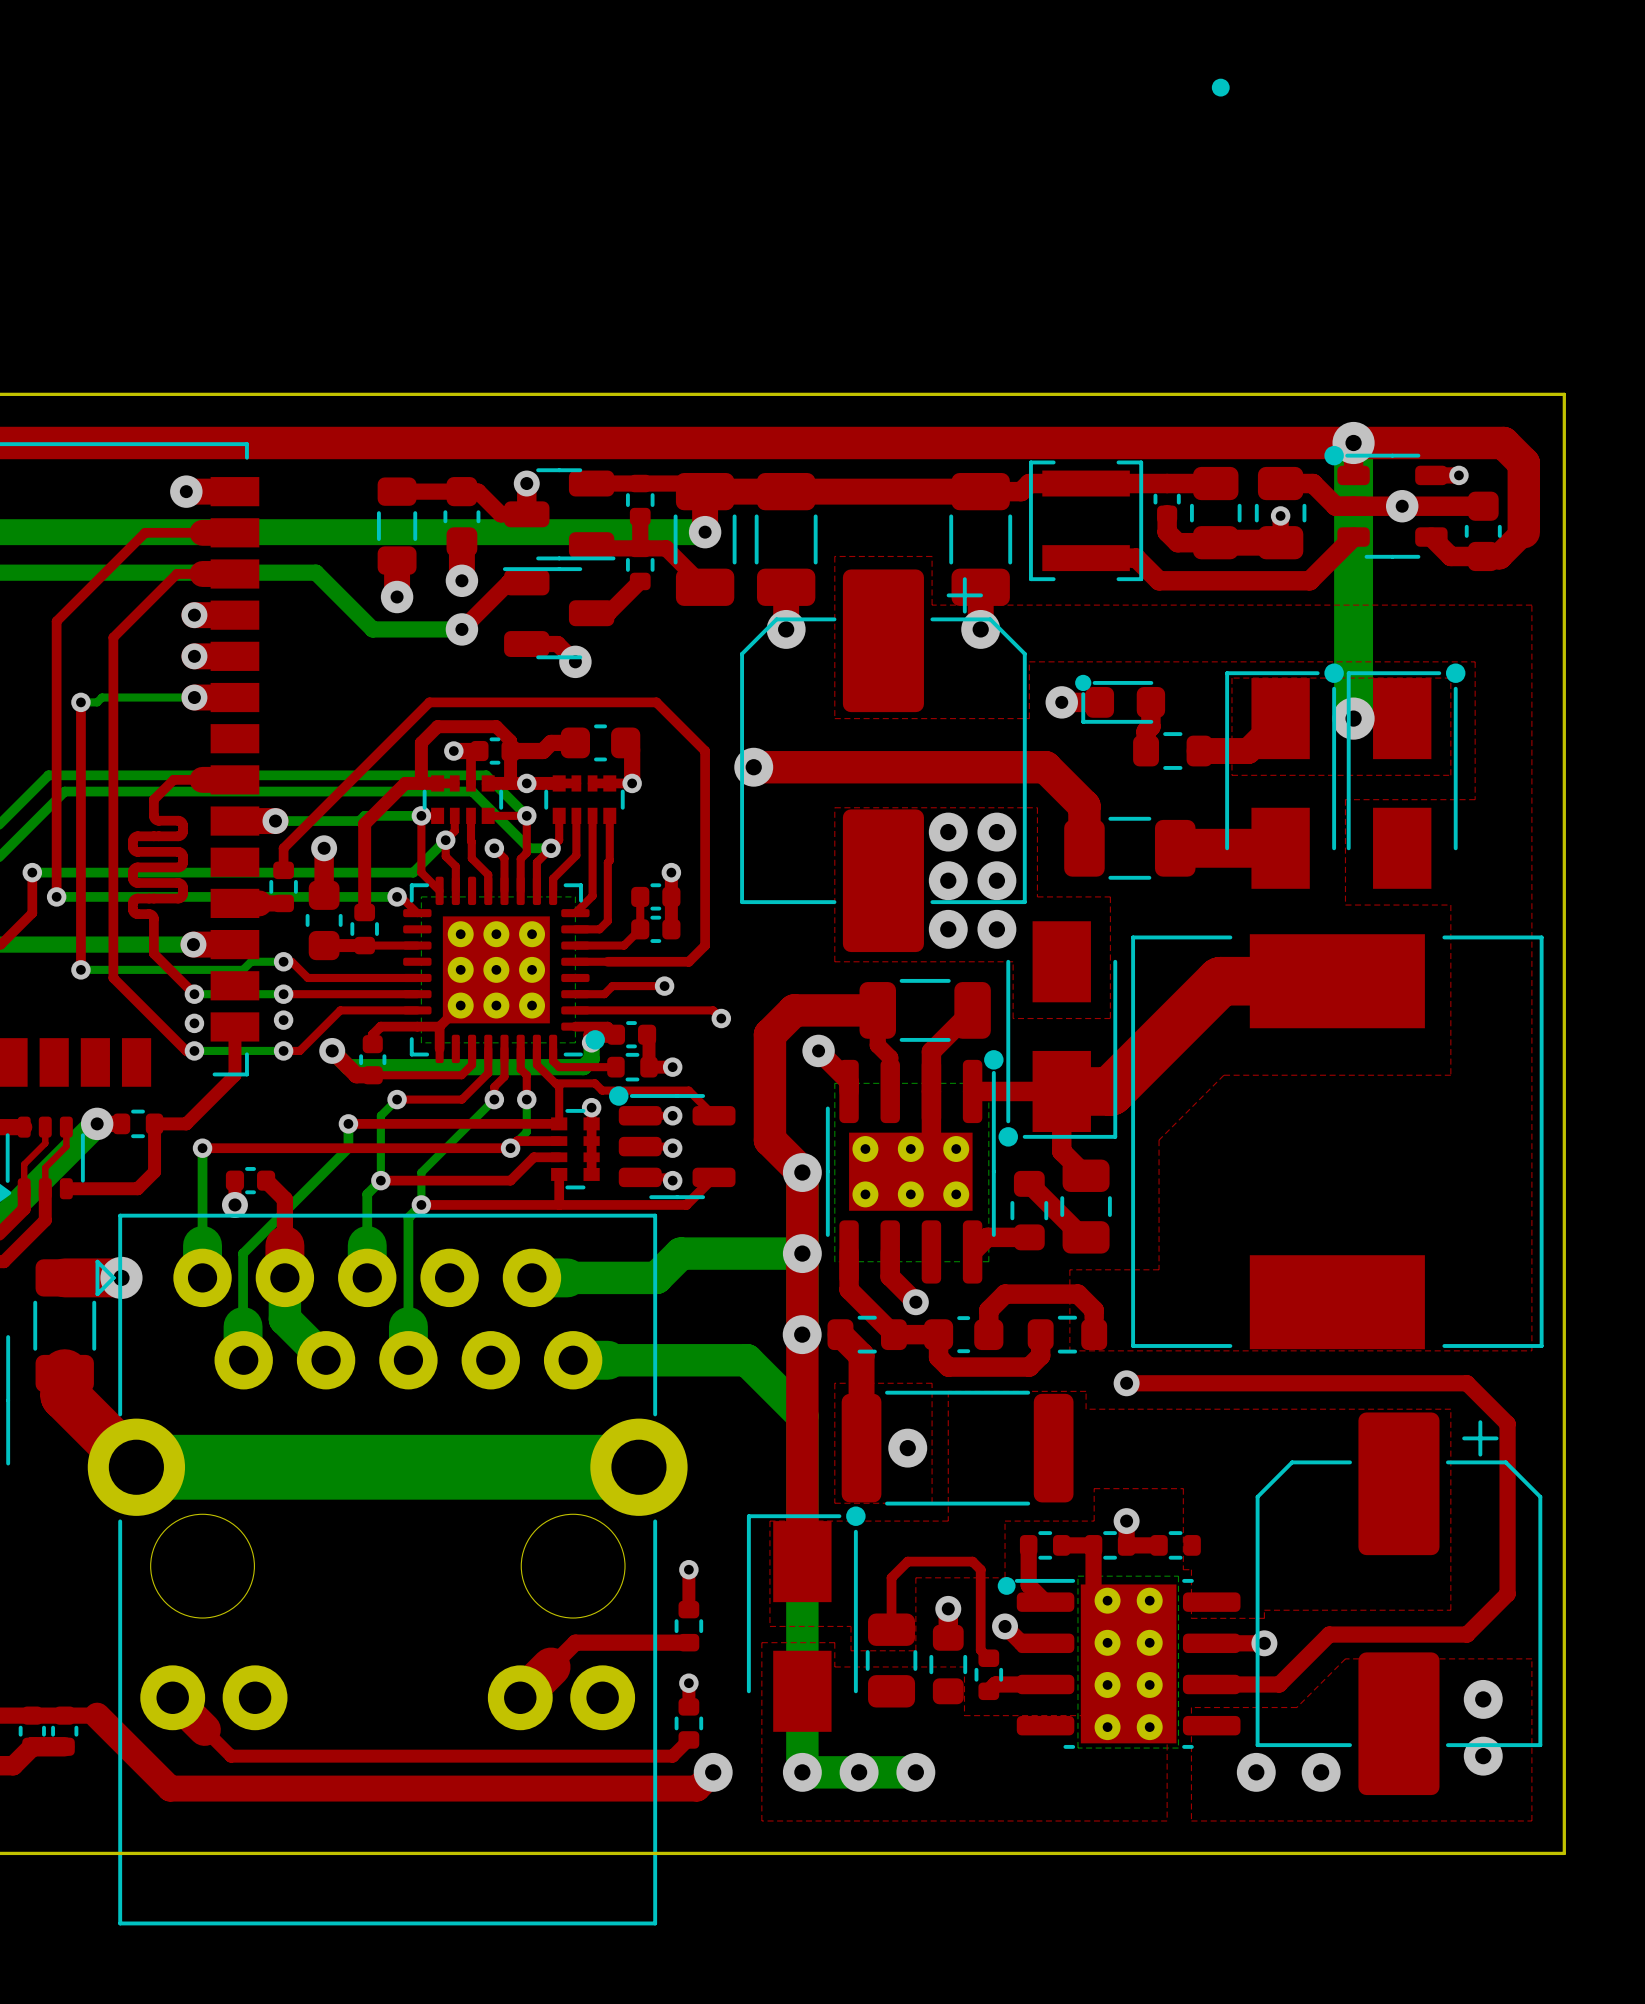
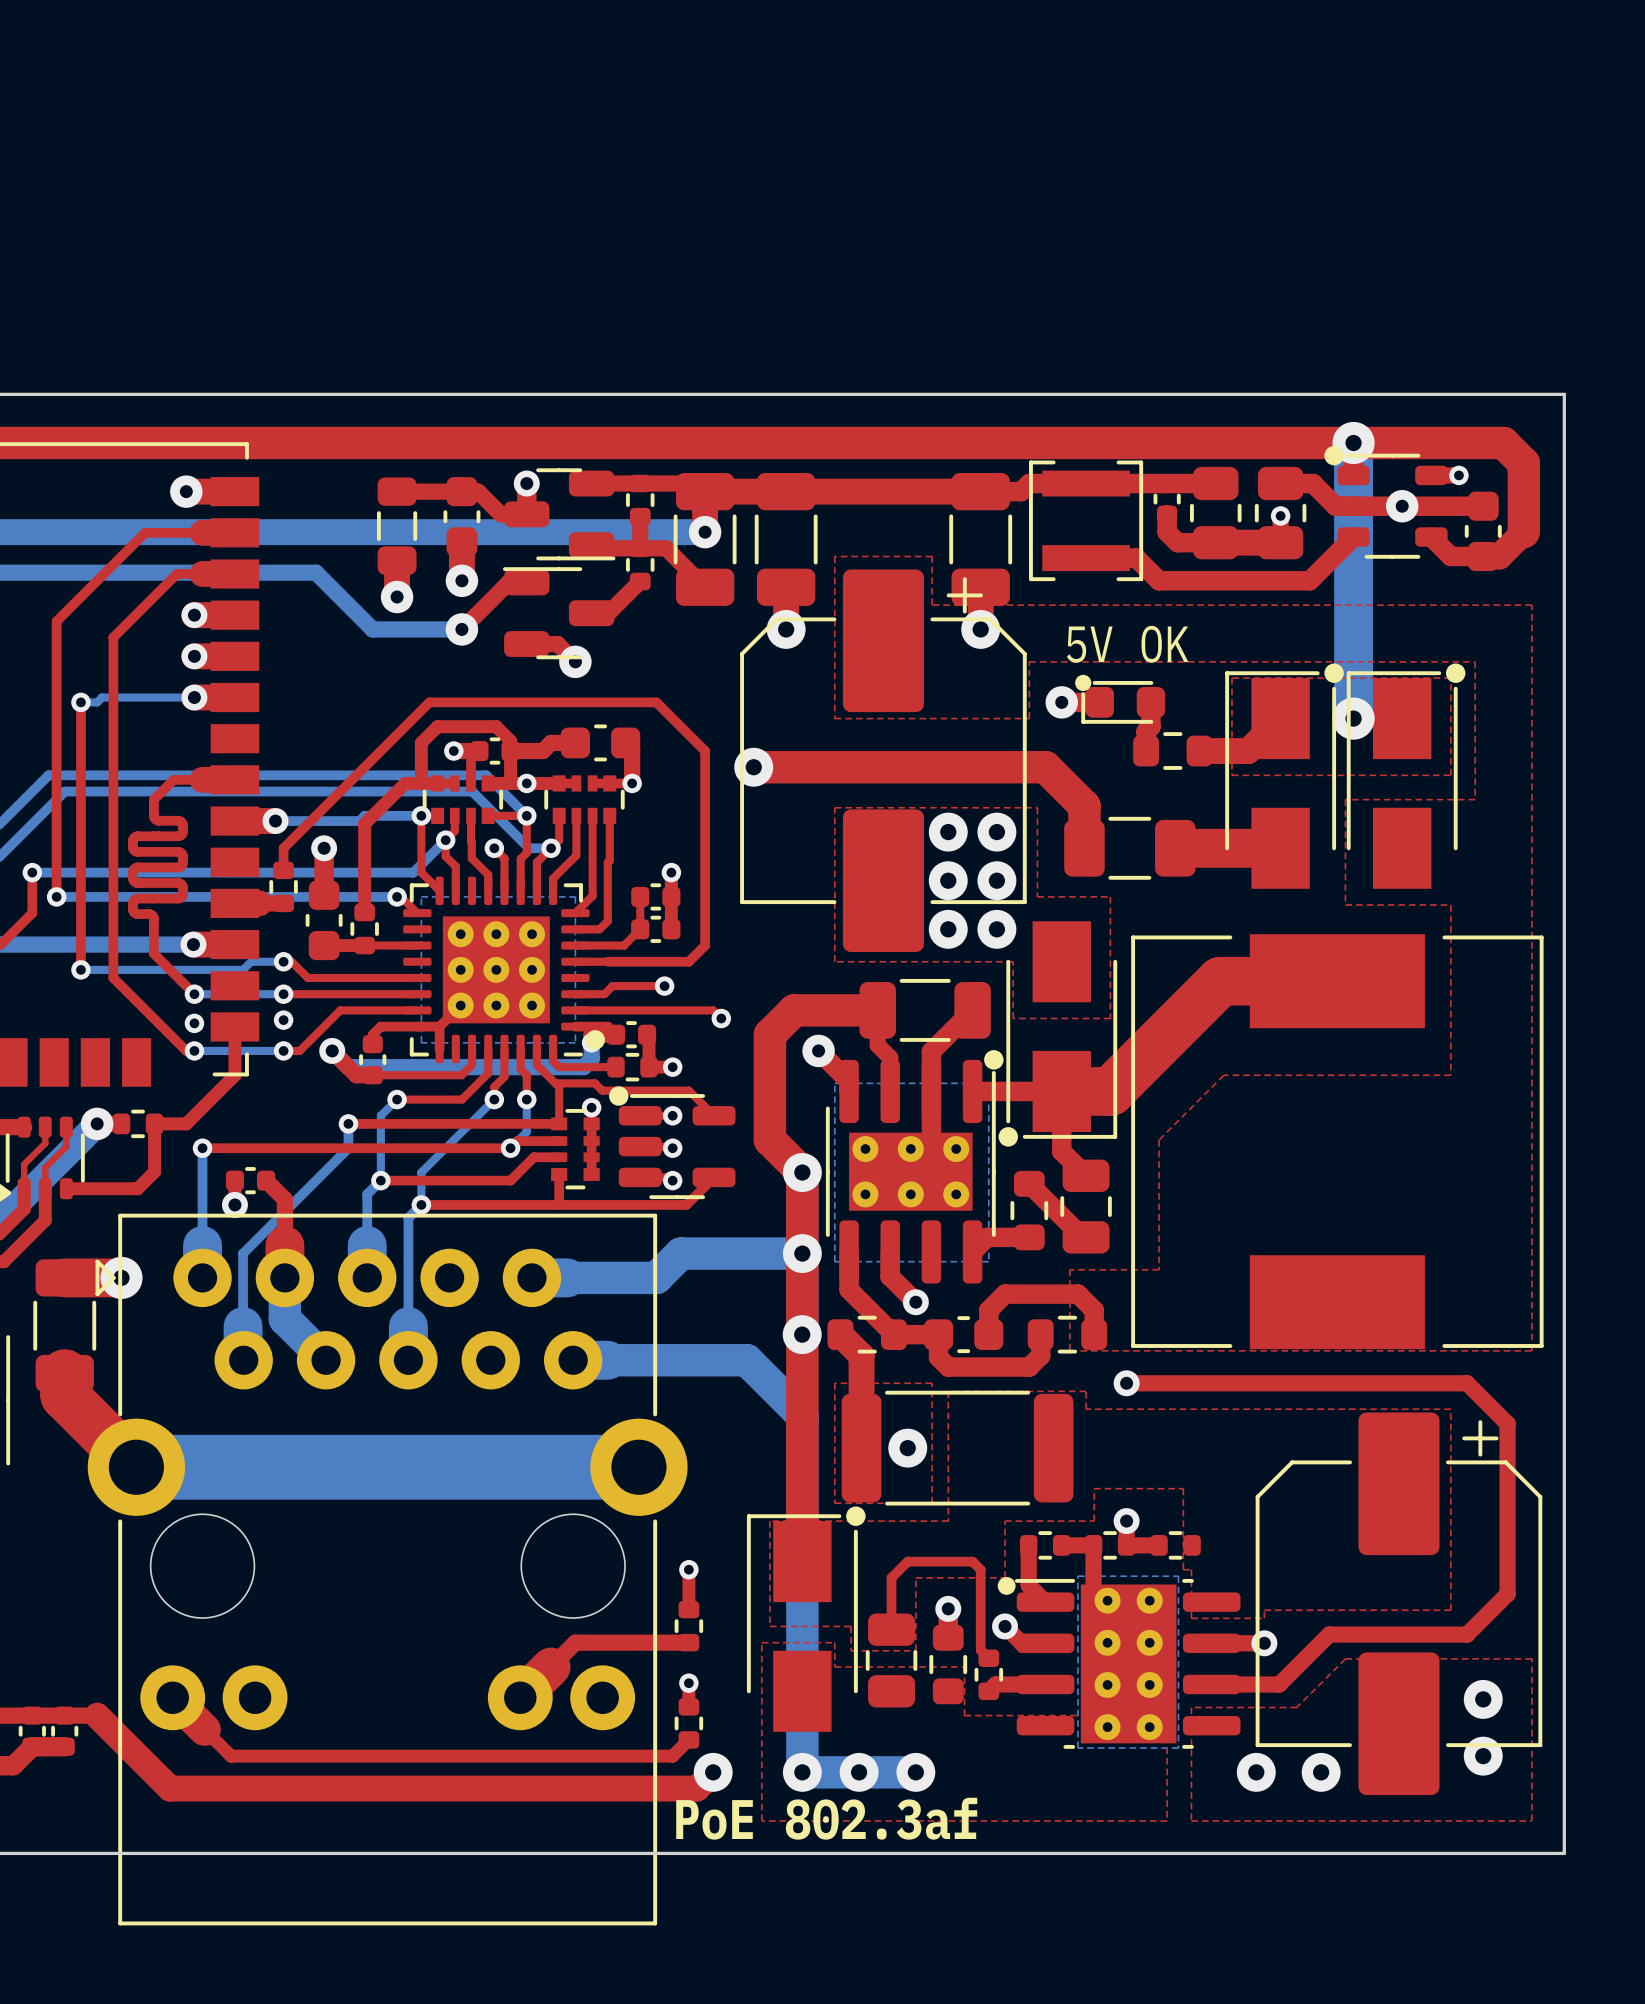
drawing: [1211, 78, 1230, 97] -> none
text: none -> 5V OK (1127, 644)
text: none -> PoE 802.3af (826, 1818)

